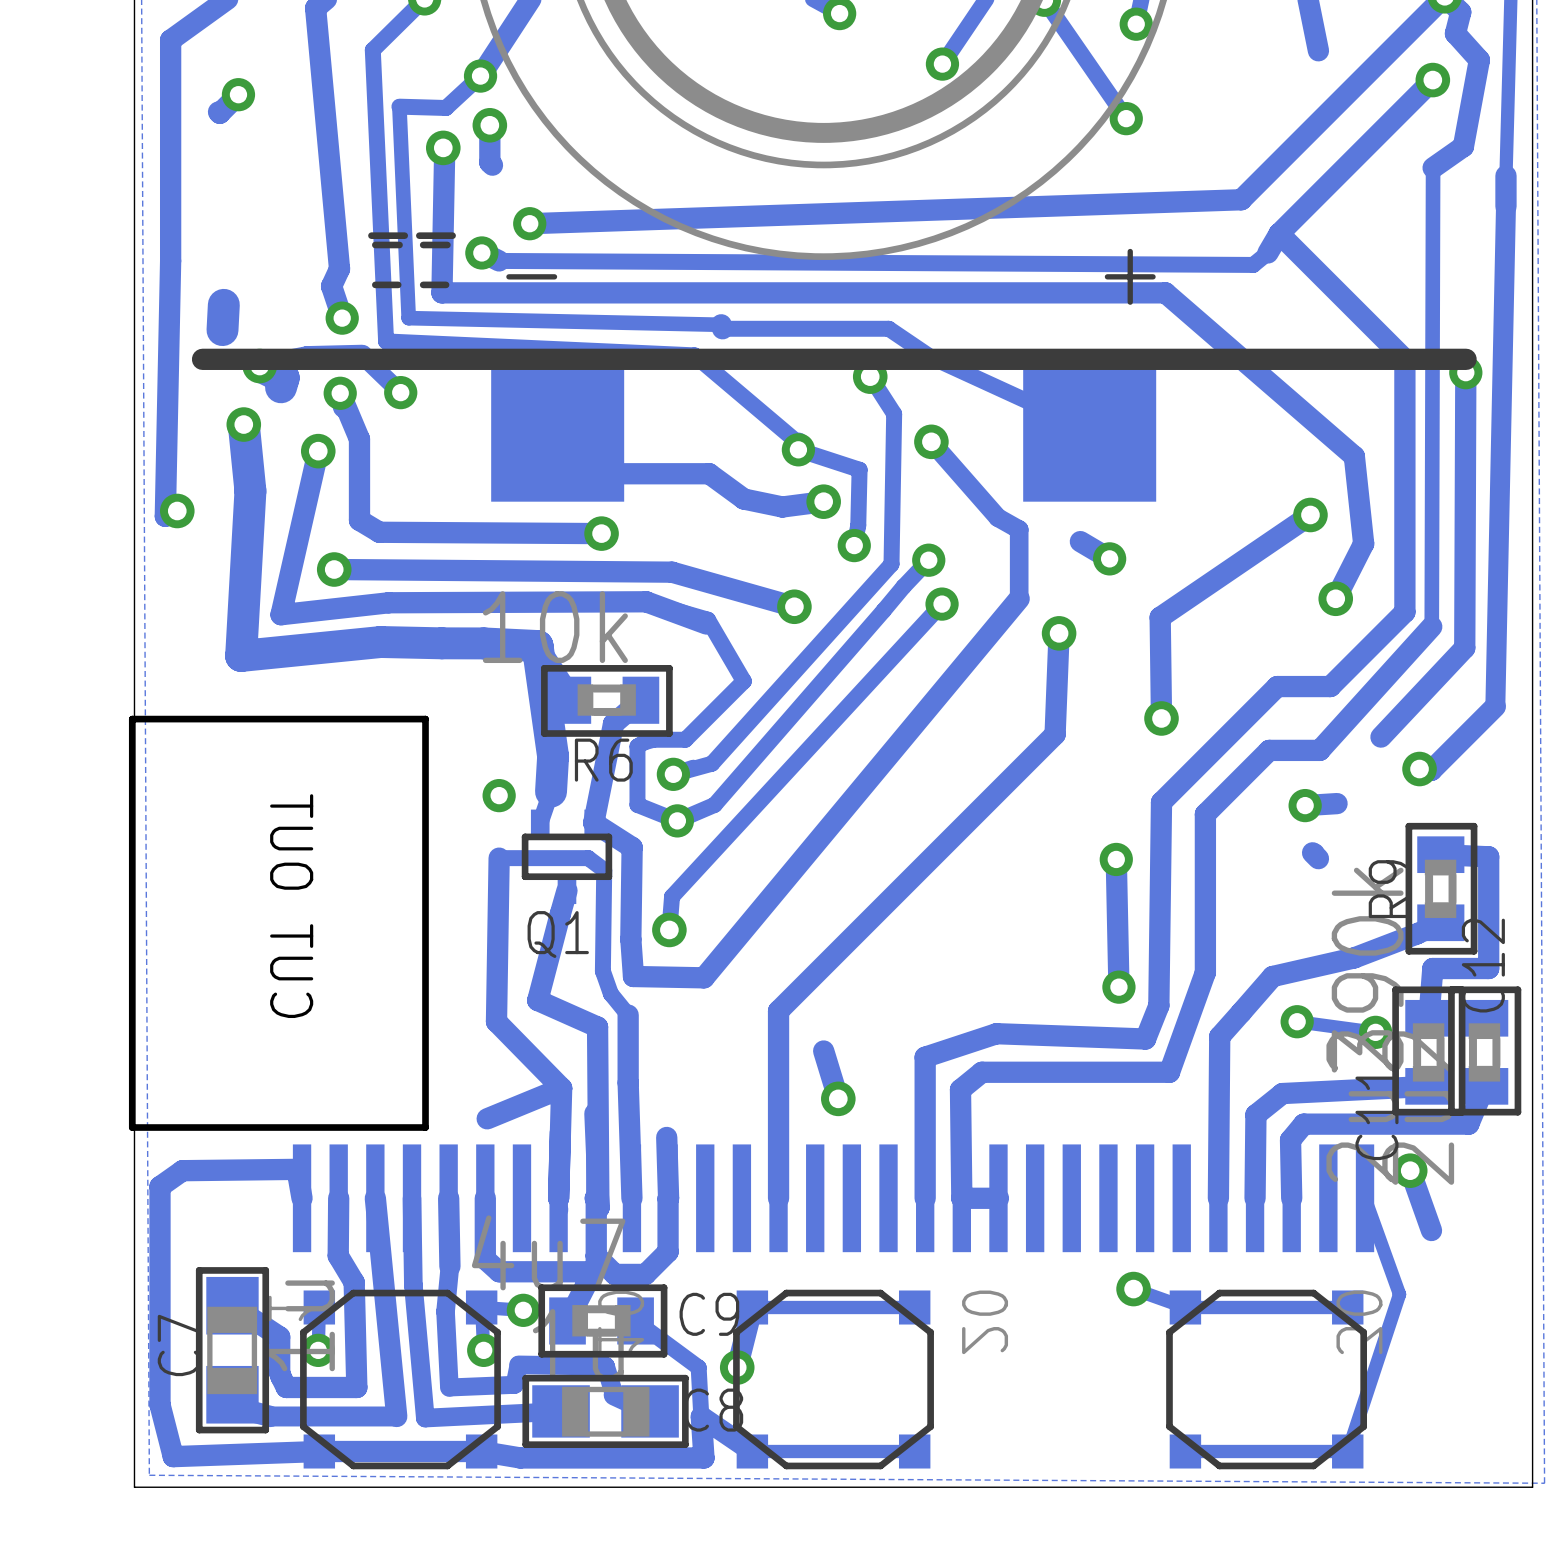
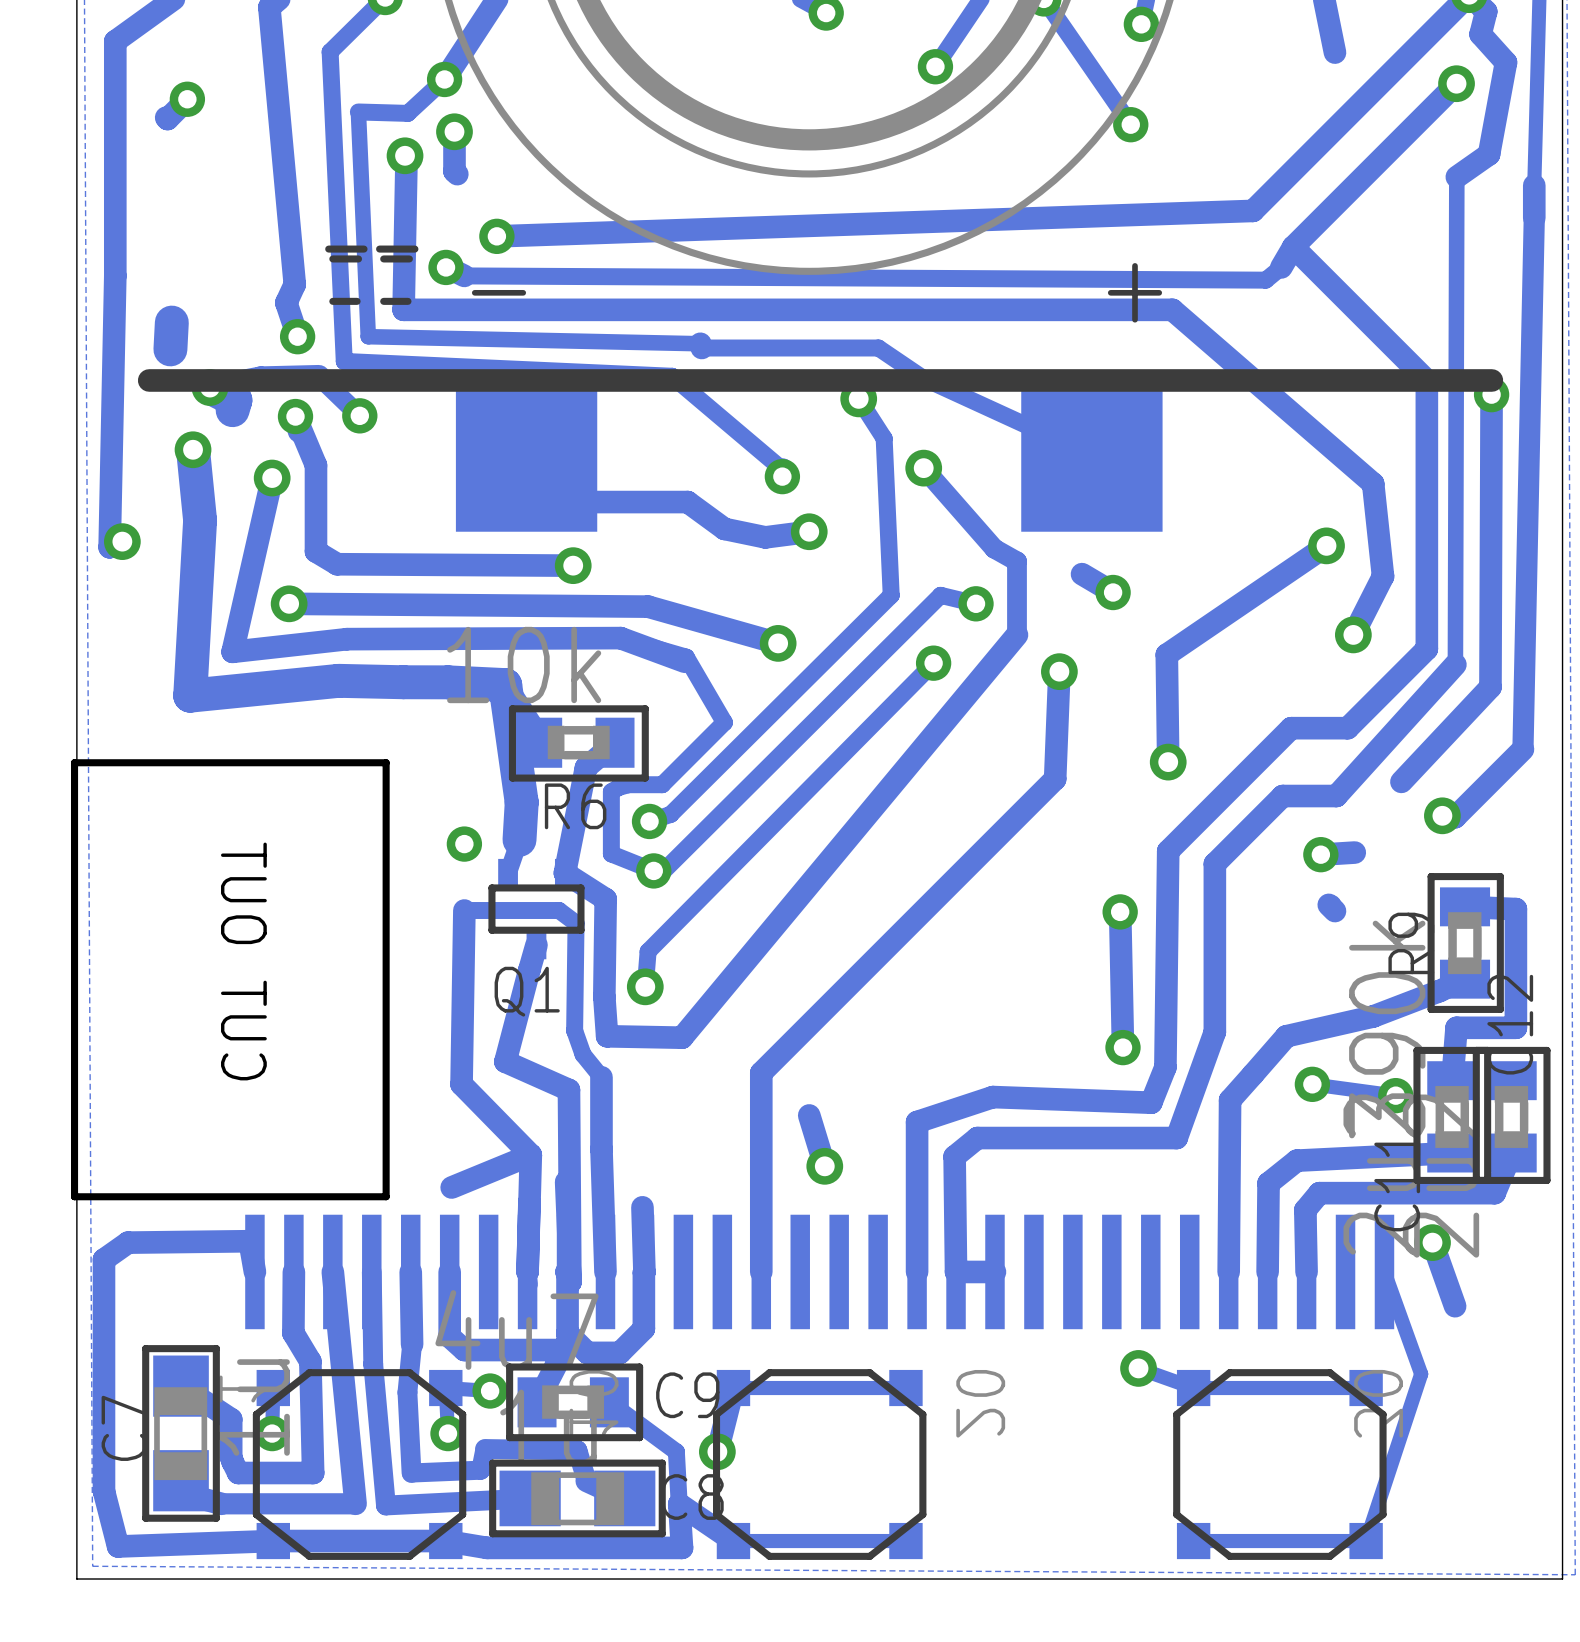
track: (894, 413) (891, 564) (711, 763) (673, 774) -> (884, 438) (891, 595) (670, 814)
track: (798, 449) (859, 469) (858, 525) (854, 545) -> none
via: (854, 545) -> none
track: (928, 560) (903, 586) (714, 804) (677, 820) -> none
via: (928, 560) -> none
track: none -> (976, 603) (940, 595) (660, 873)
via: none -> (976, 603)
track: (942, 604) (672, 896) -> (933, 663) (648, 951)
via position: (942, 604) -> (933, 663)

